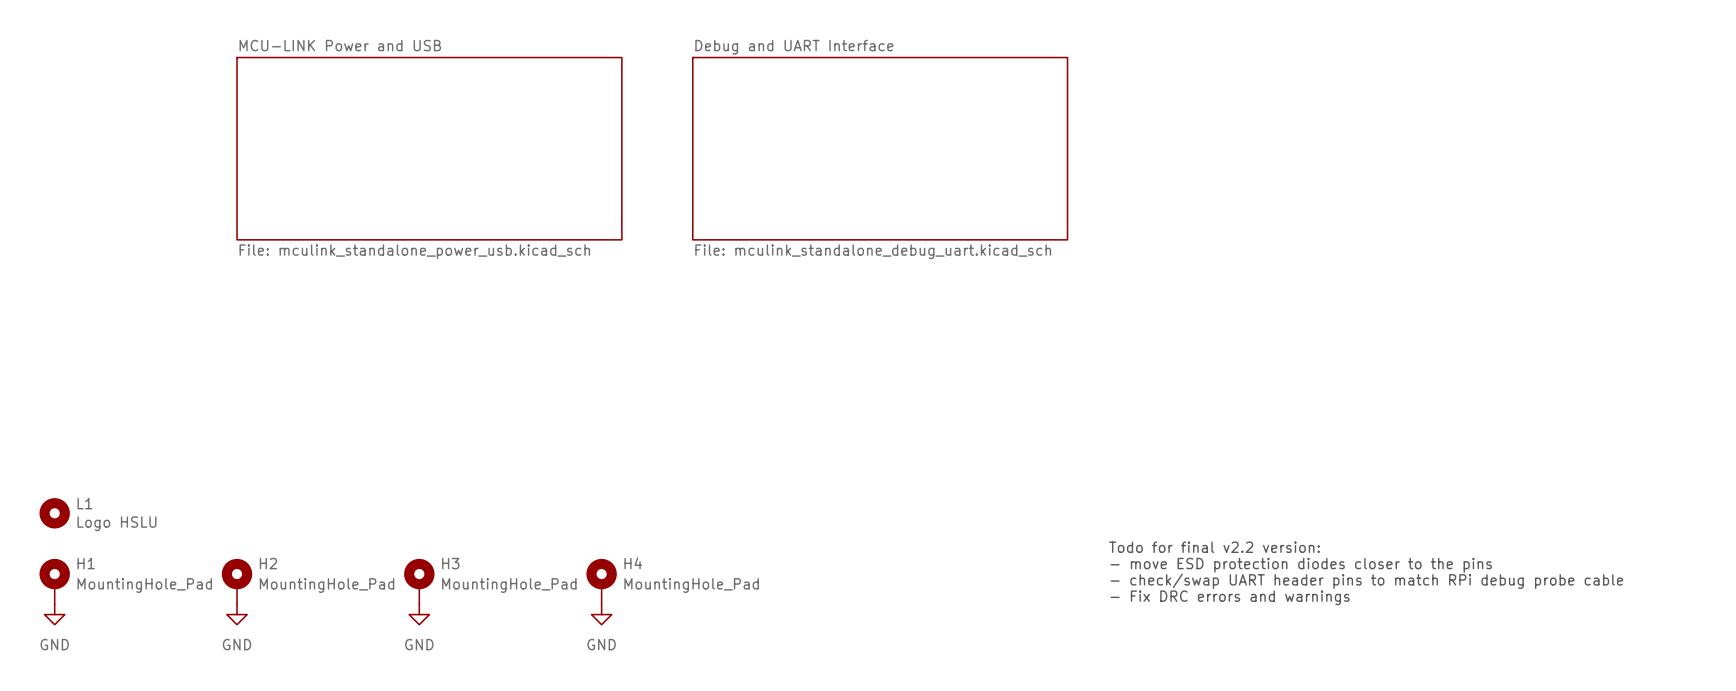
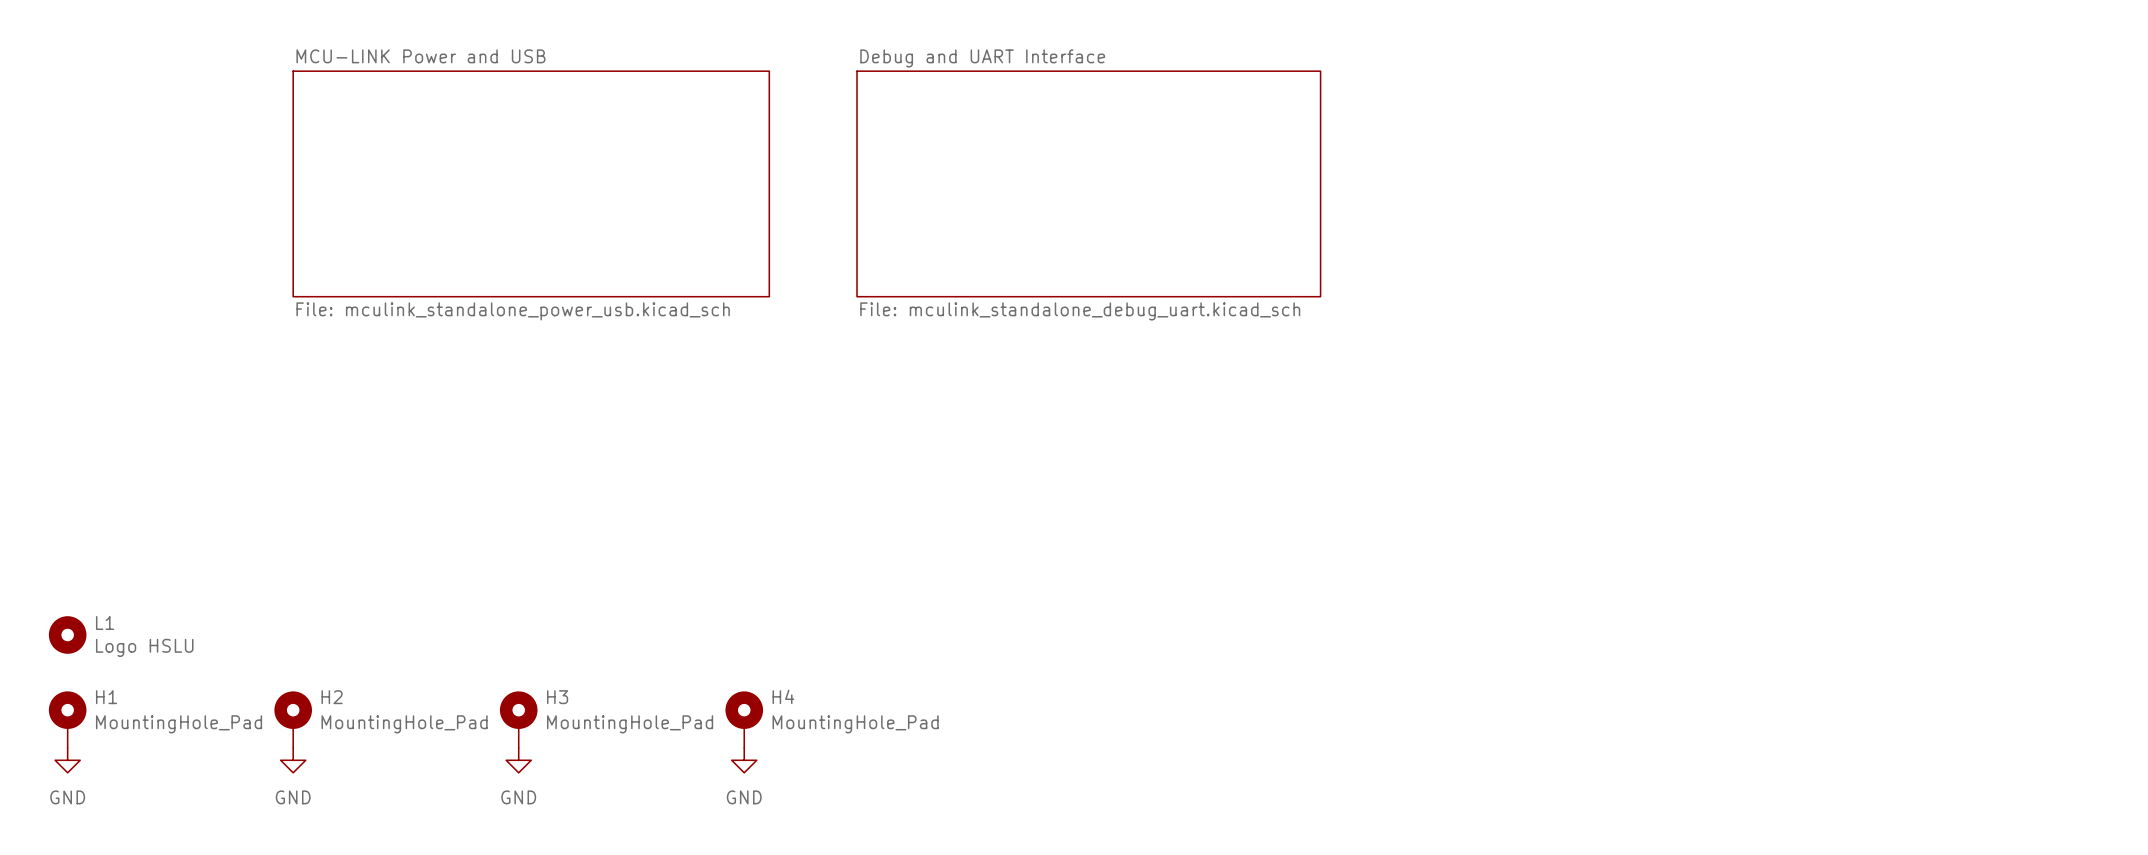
text: Todo for final v2.2 version: (1214, 547) -> none
text: - move ESD protection diodes closer to the pins (1301, 565) -> none
text: - check/swap UART header pins to match RPi debug probe cable (1366, 581) -> none
text: - Fix DRC errors and warnings (1230, 597) -> none

